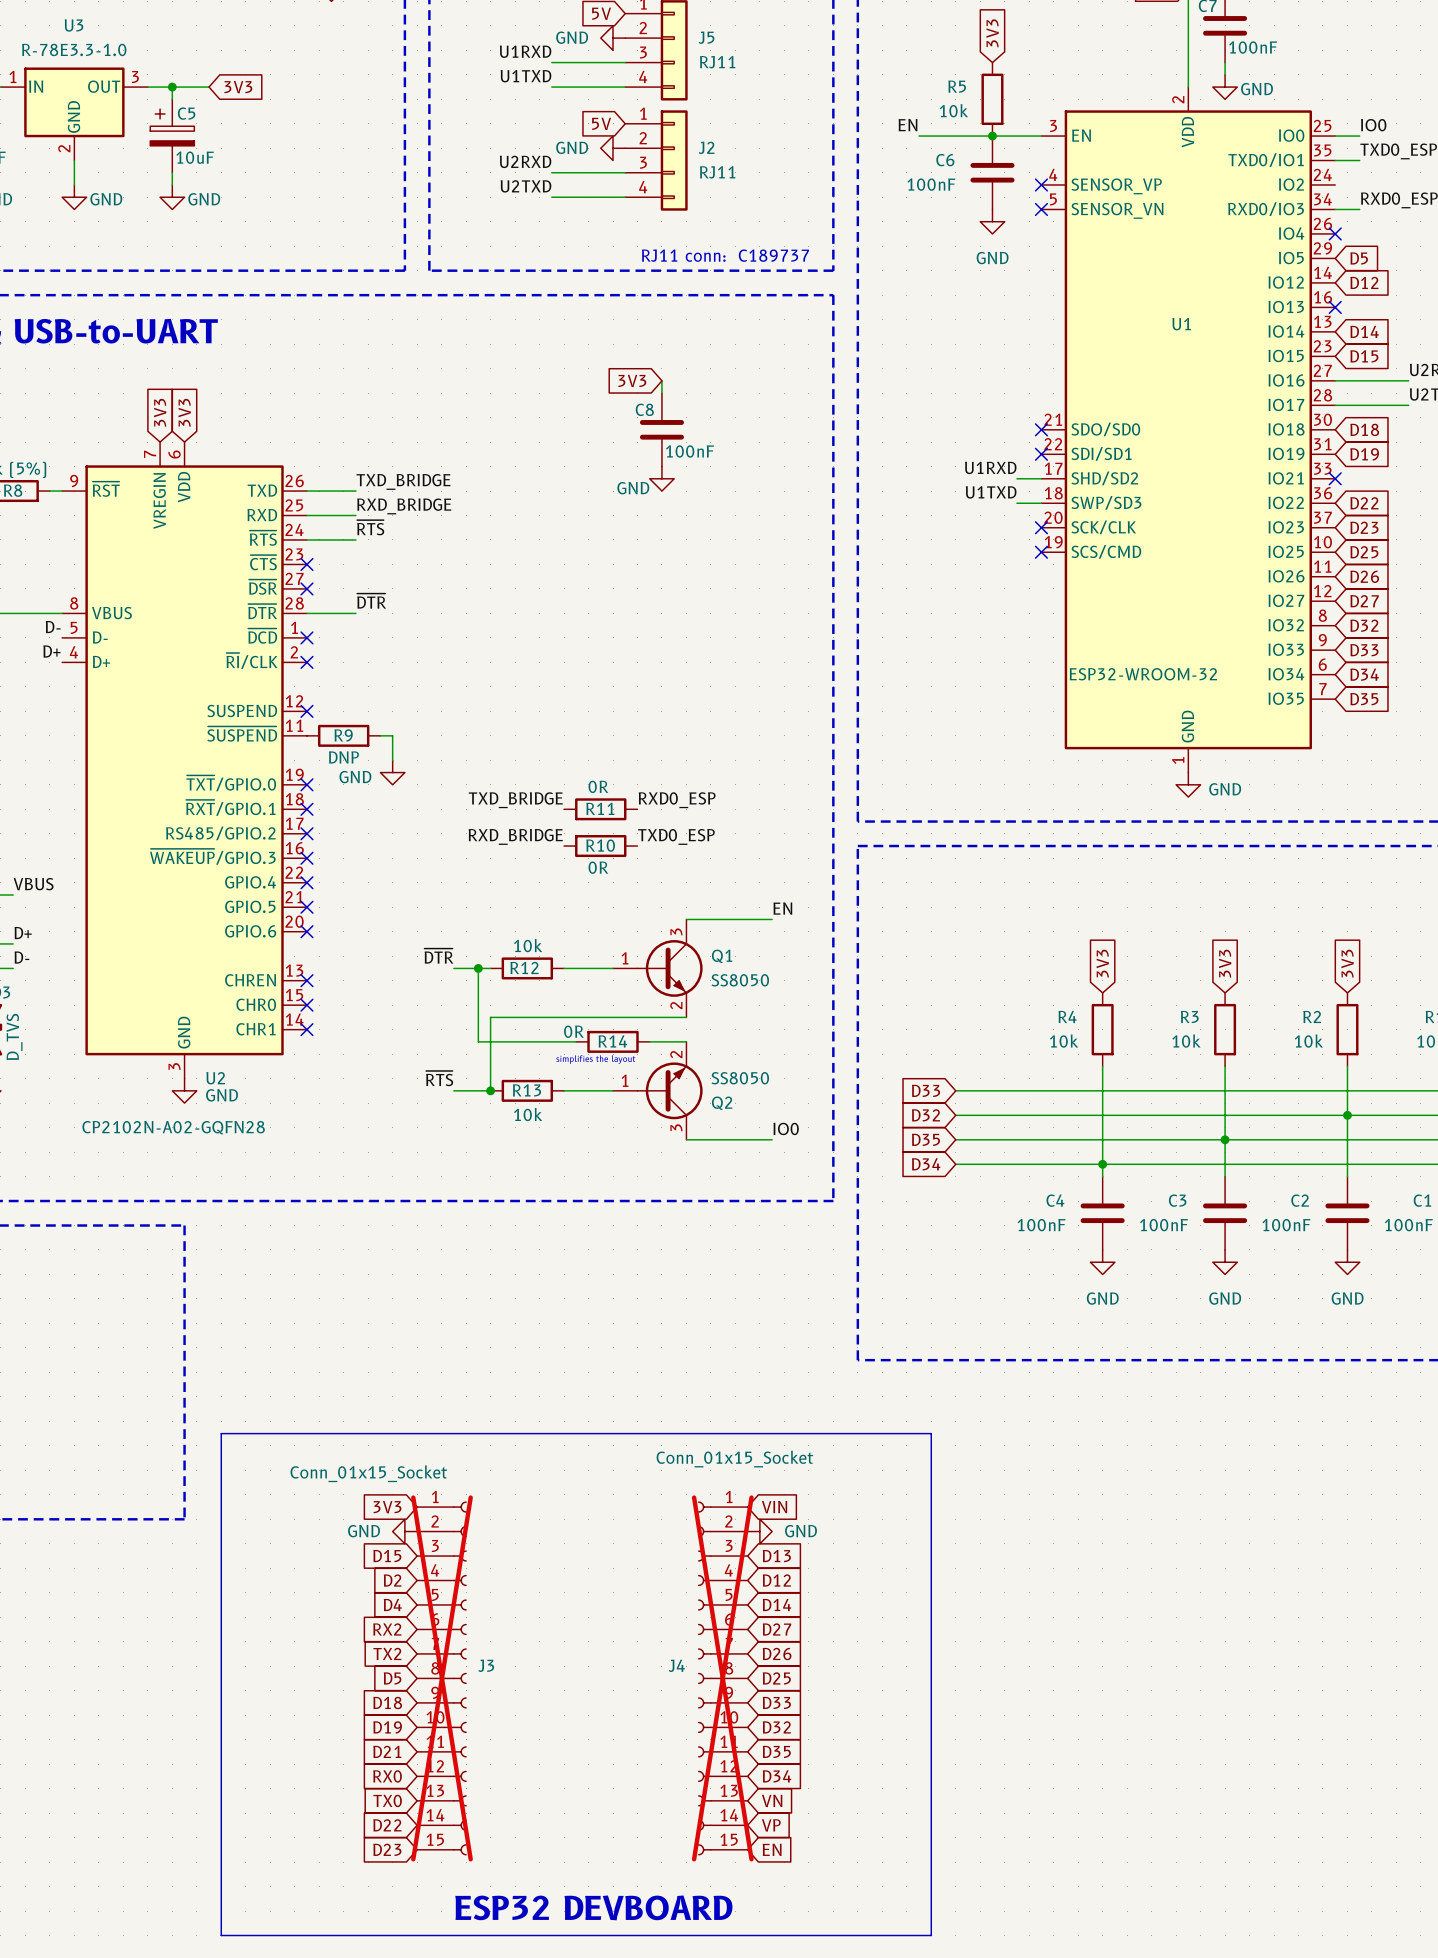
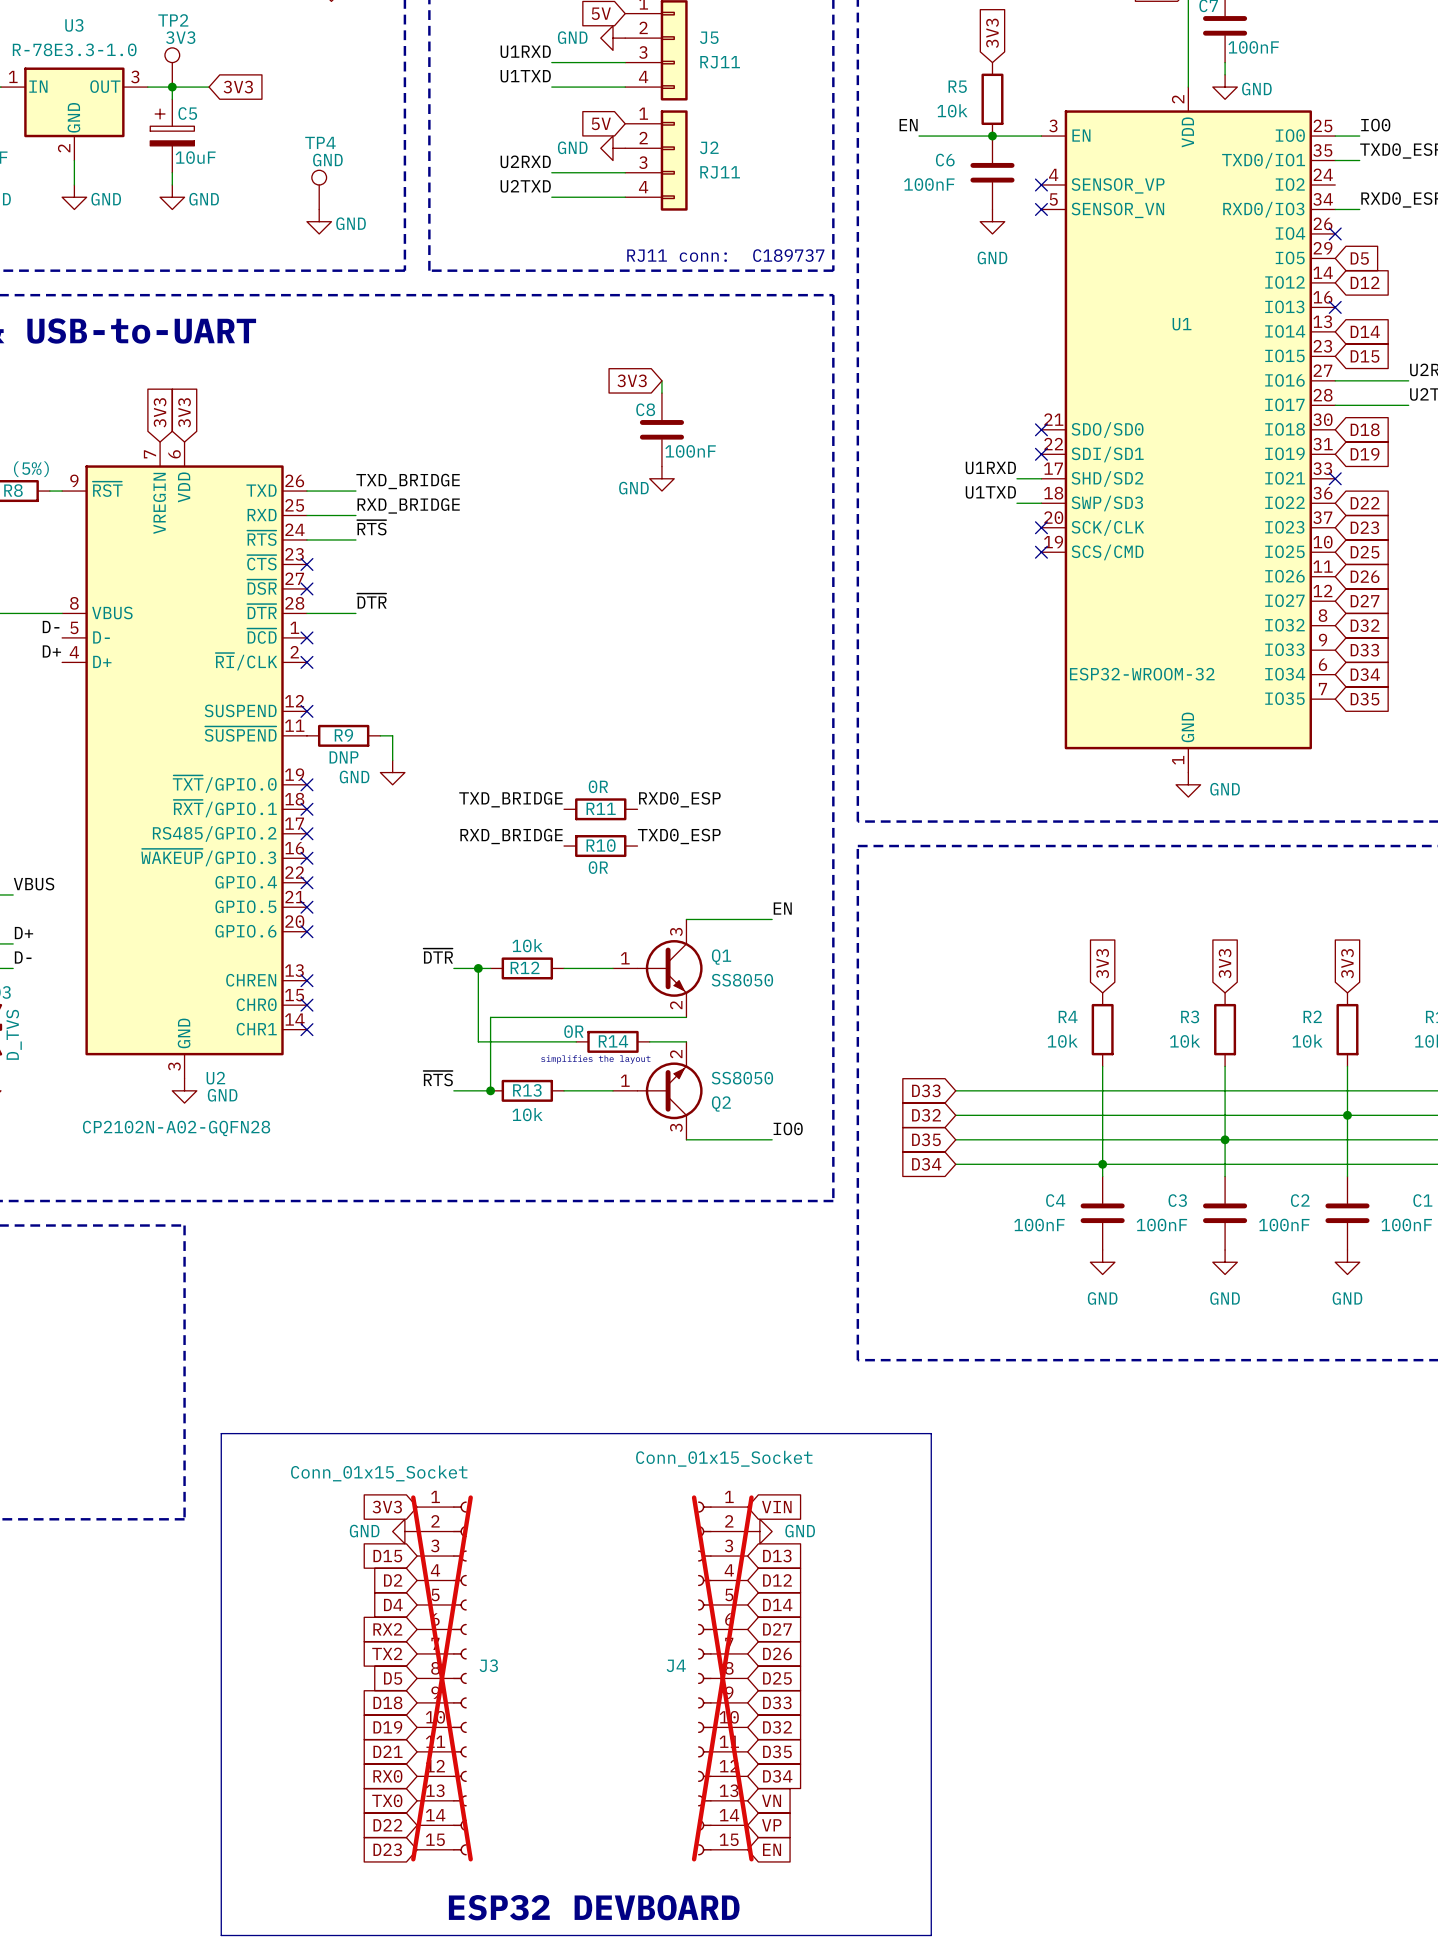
TP2: none -> 3V3 (172, 67)
TP4: none -> GND (319, 189)
power symbol: none -> GND (319, 221)

